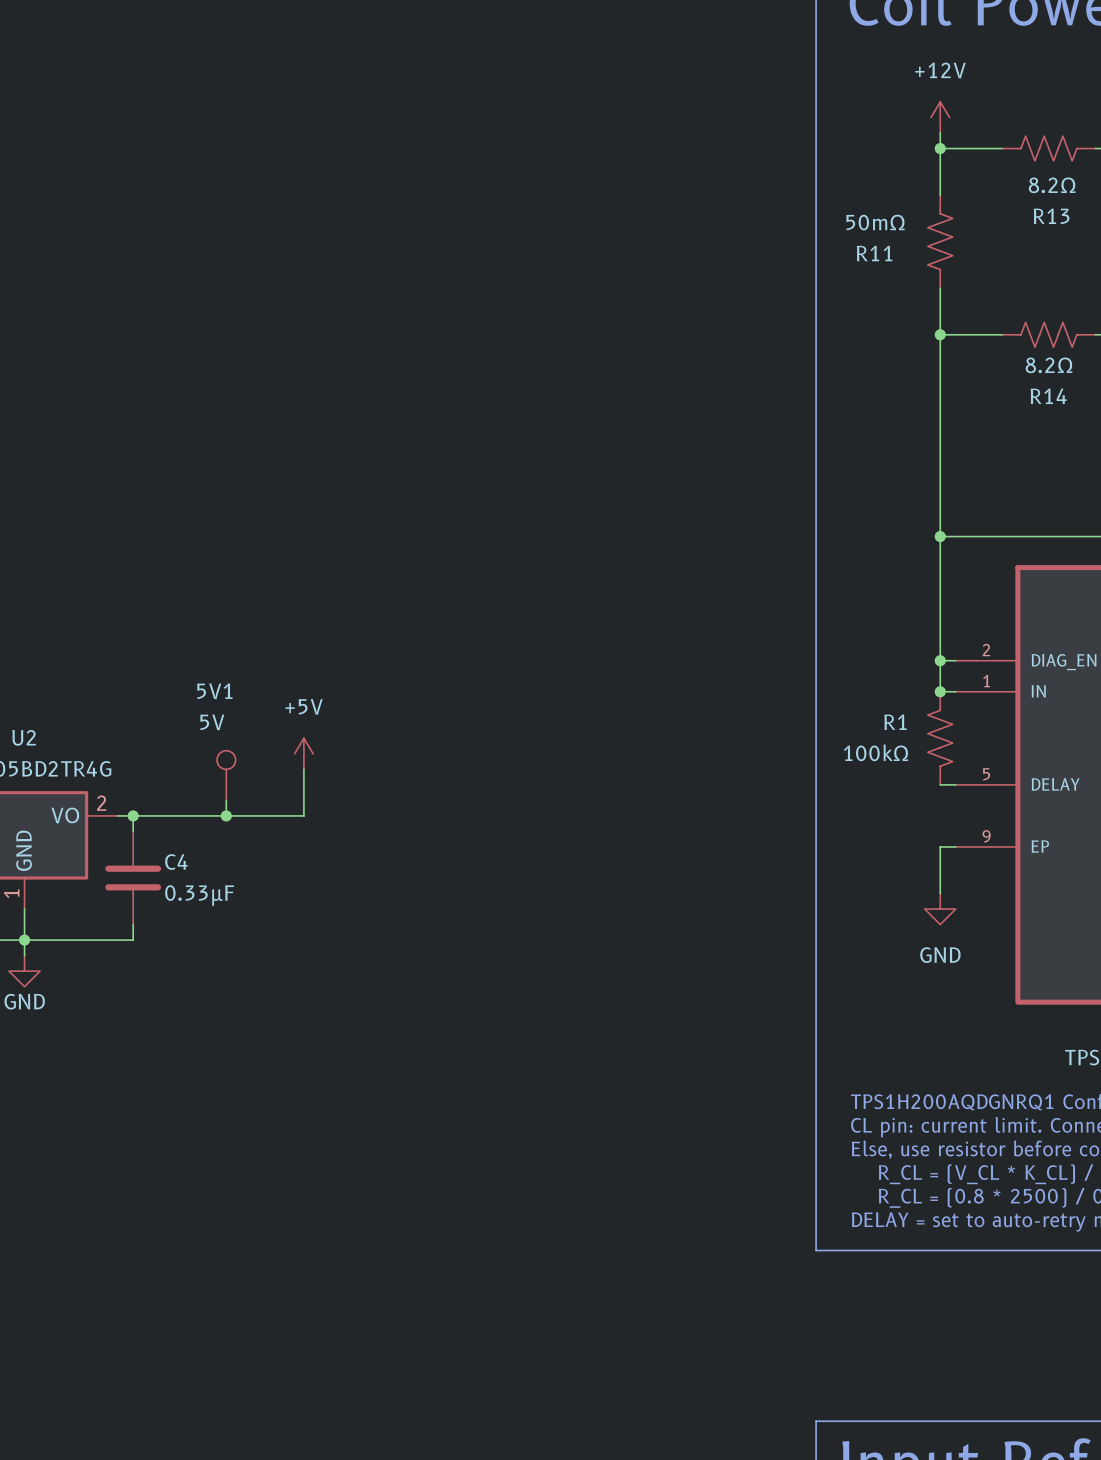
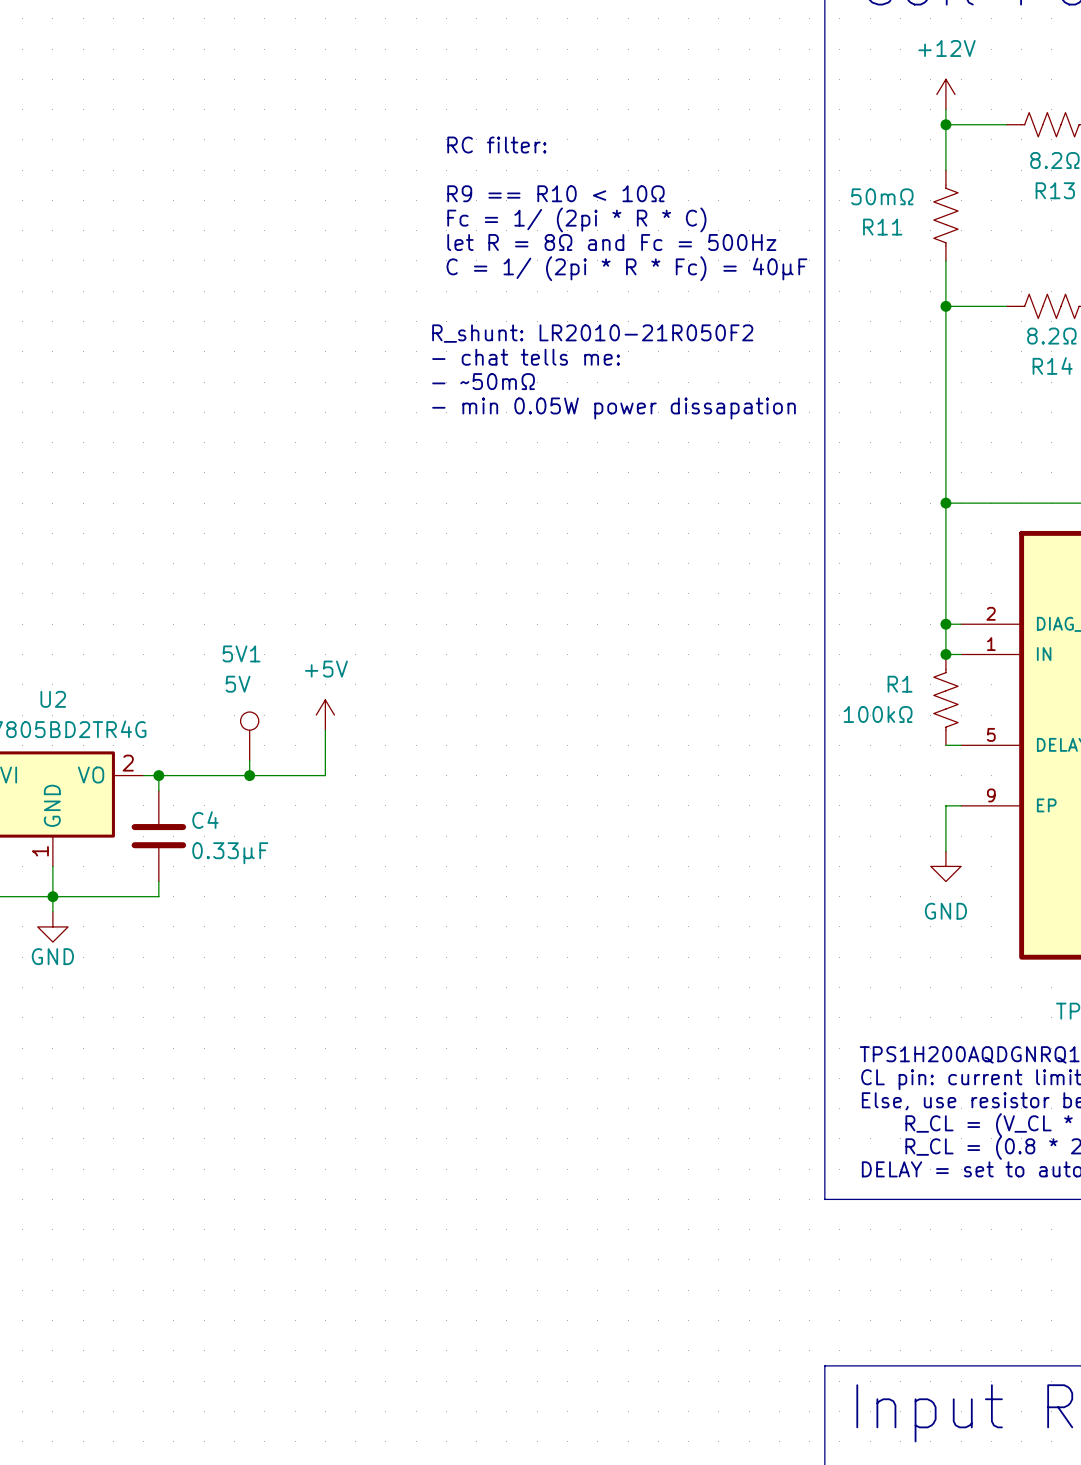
text: none -> RC filter: (496, 145)
text: none -> R9 == R10 < 10Ω (555, 193)
text: none -> Fc = 1/ (2pi * R * C) (576, 219)
text: none -> let R = 8Ω and Fc = 500Hz (611, 242)
text: none -> C = 1/ (2pi * R * Fc) = 40μF (626, 268)
text: none -> R_shunt: LR2010-21R050F2 (592, 333)
text: none -> - chat tells me: (526, 357)
text: none -> - ~50mΩ (483, 381)
text: none -> - min 0.05W power dissapation (613, 408)

